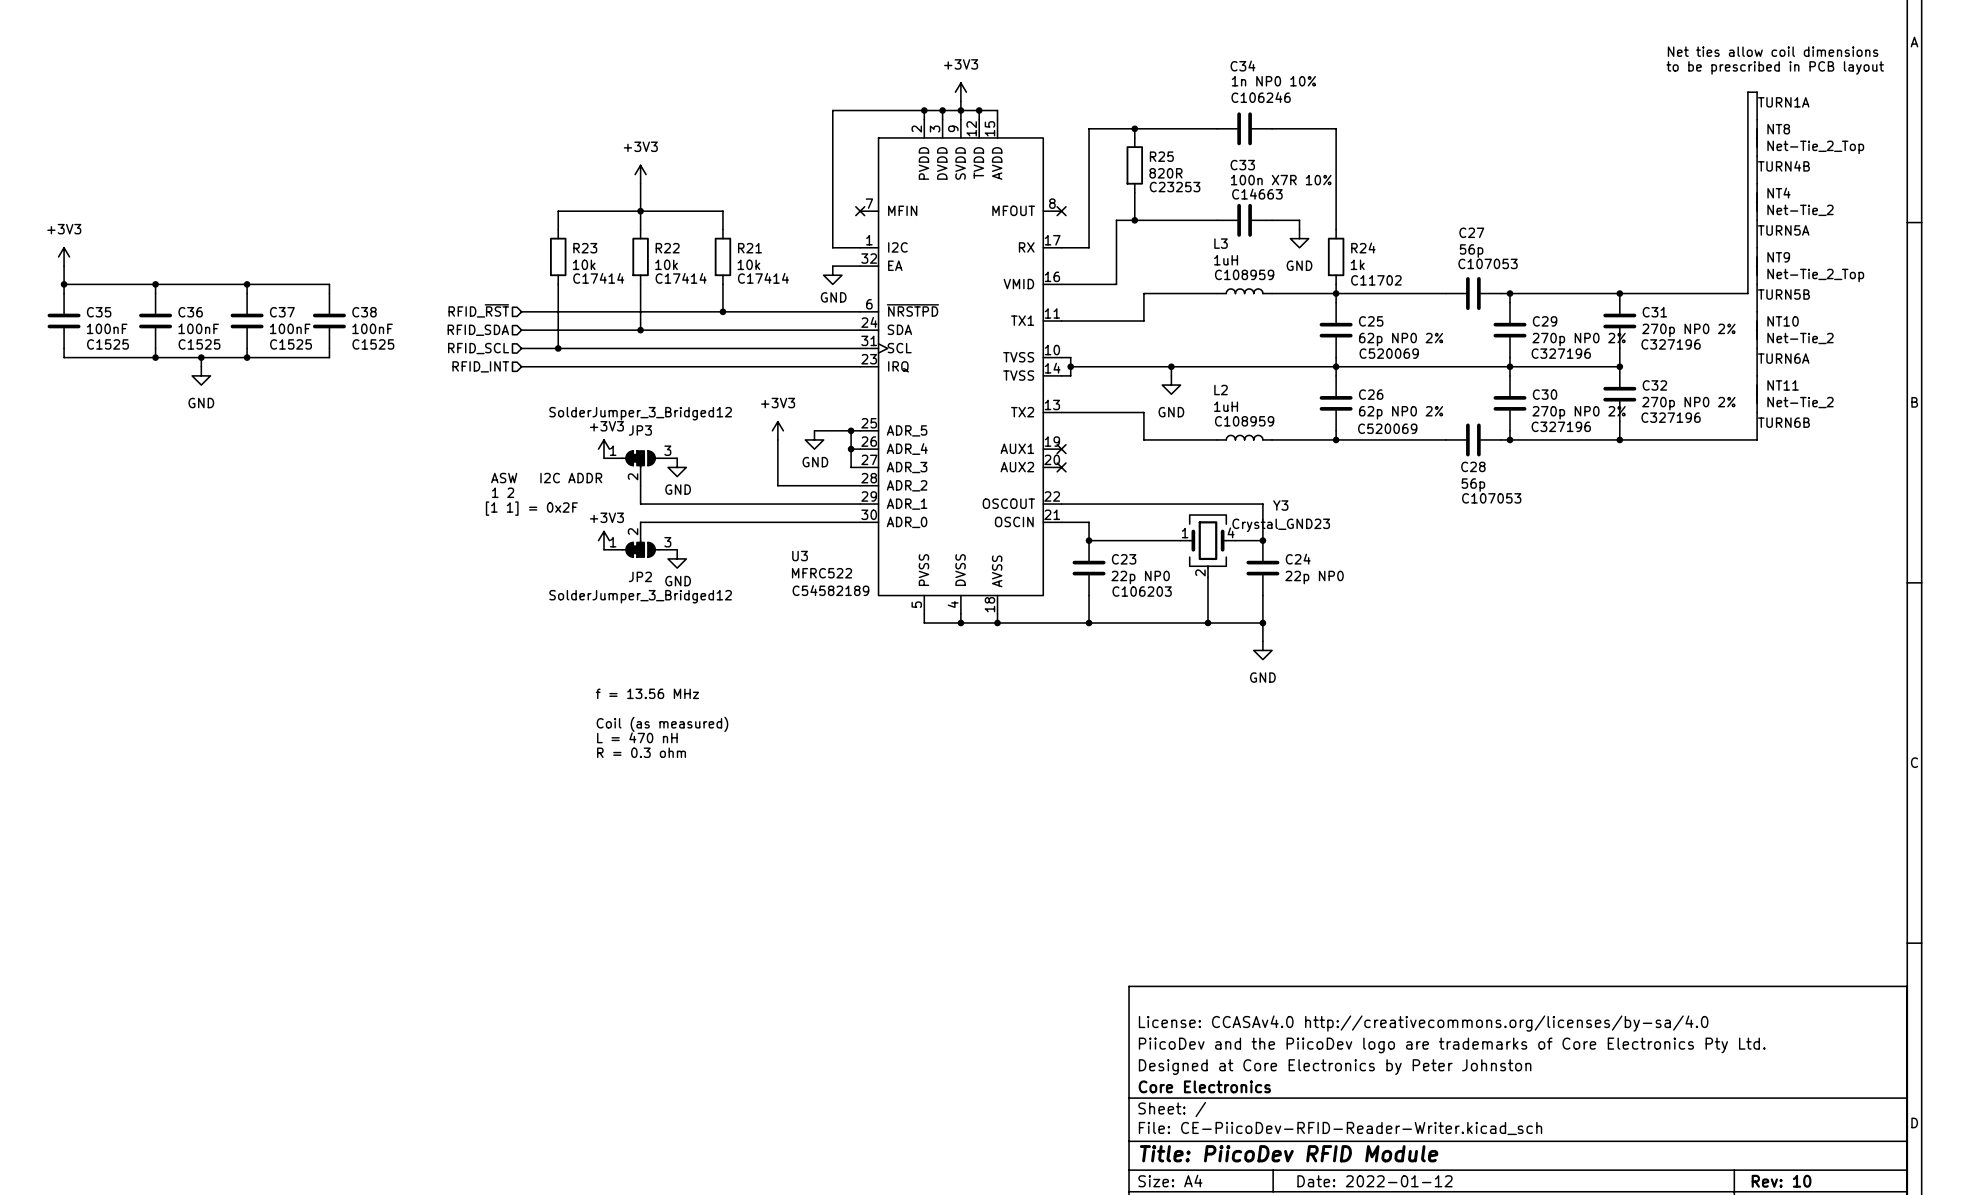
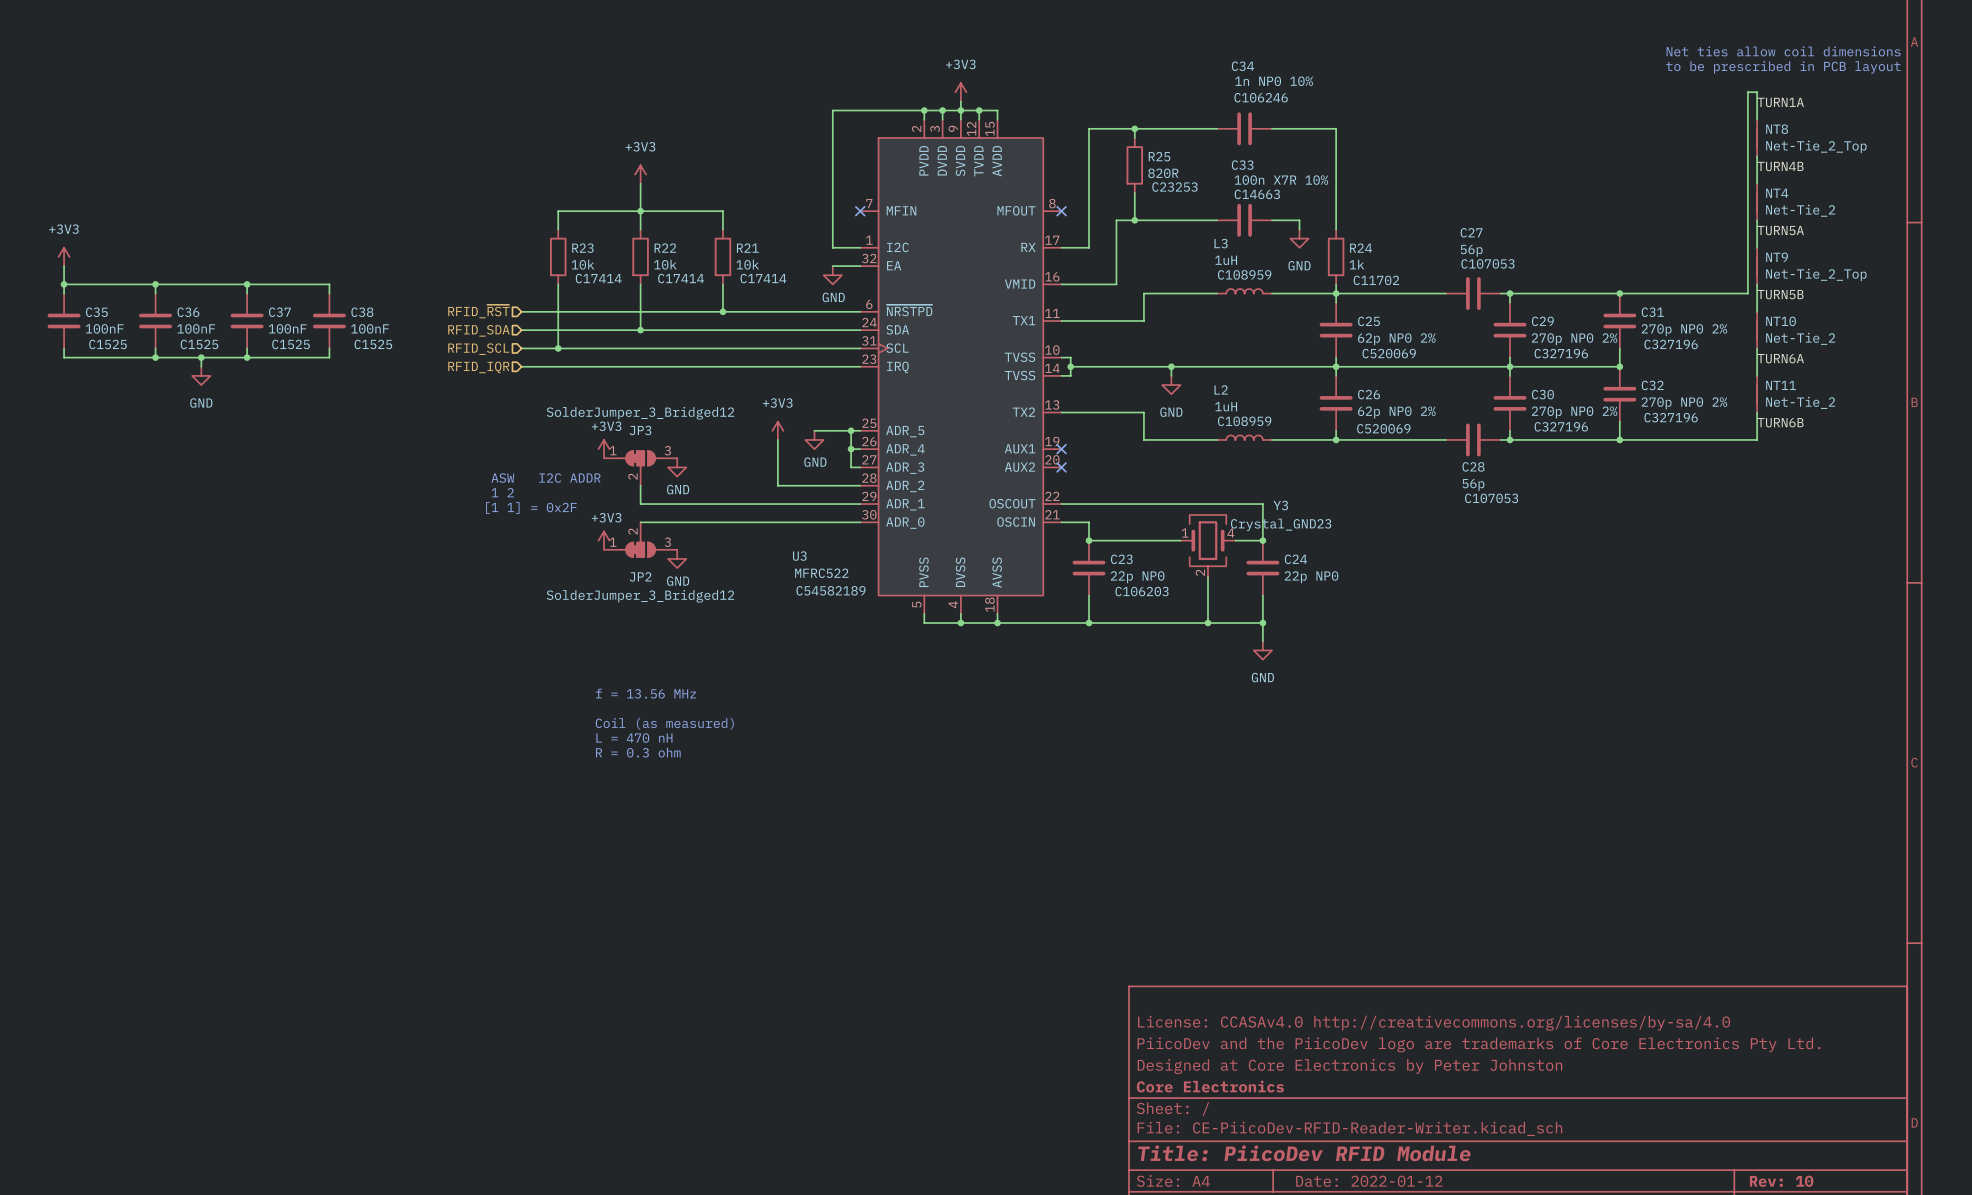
hierarchical label: RFID_INT (480, 366) -> RFID_IQR (478, 367)

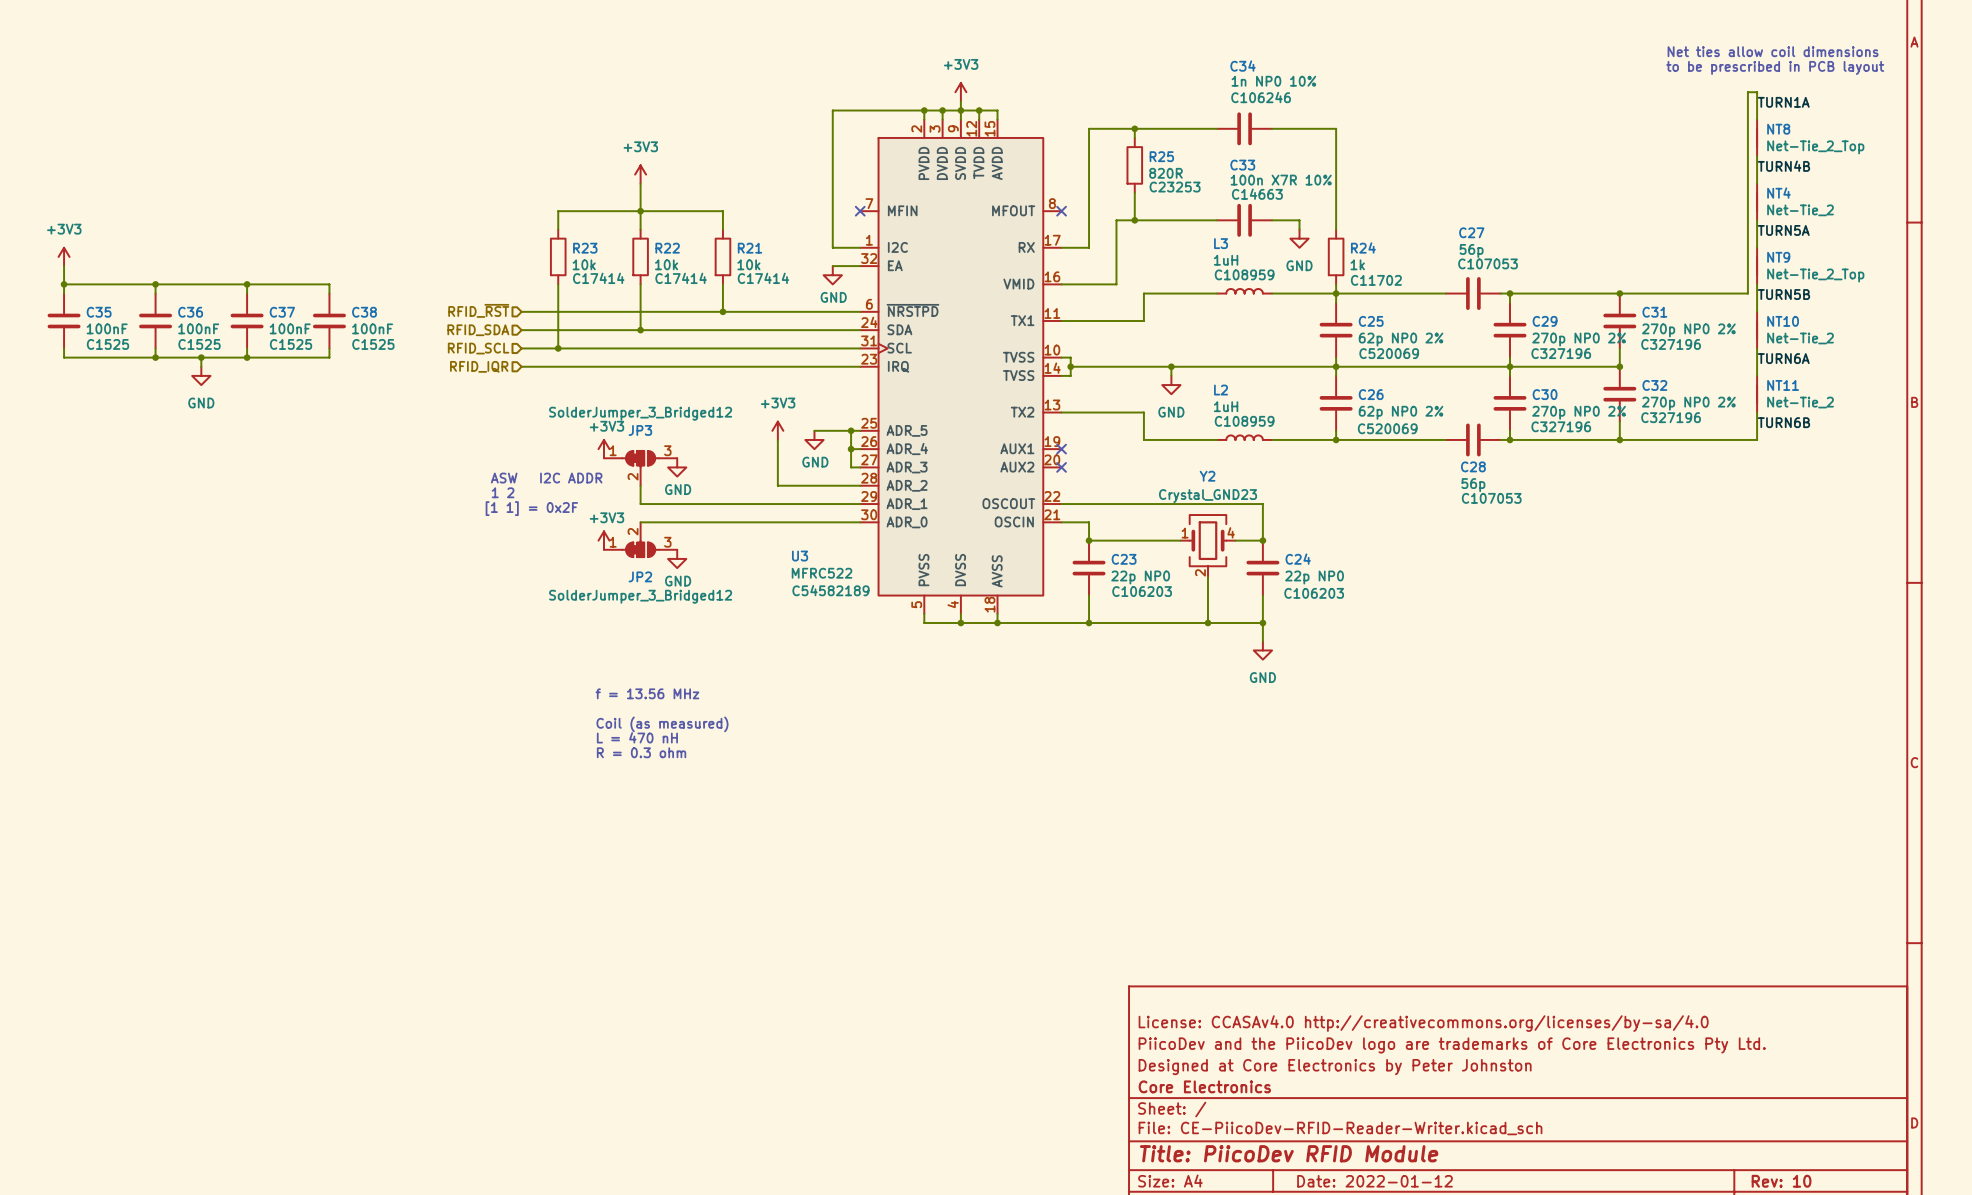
Y3 name: Y3 (1280, 505) -> Y2 (1207, 476)
Y3 value position: Crystal_GND23 (1281, 524) -> Crystal_GND23 (1207, 496)
C24 text: none -> C106203 (1314, 593)

